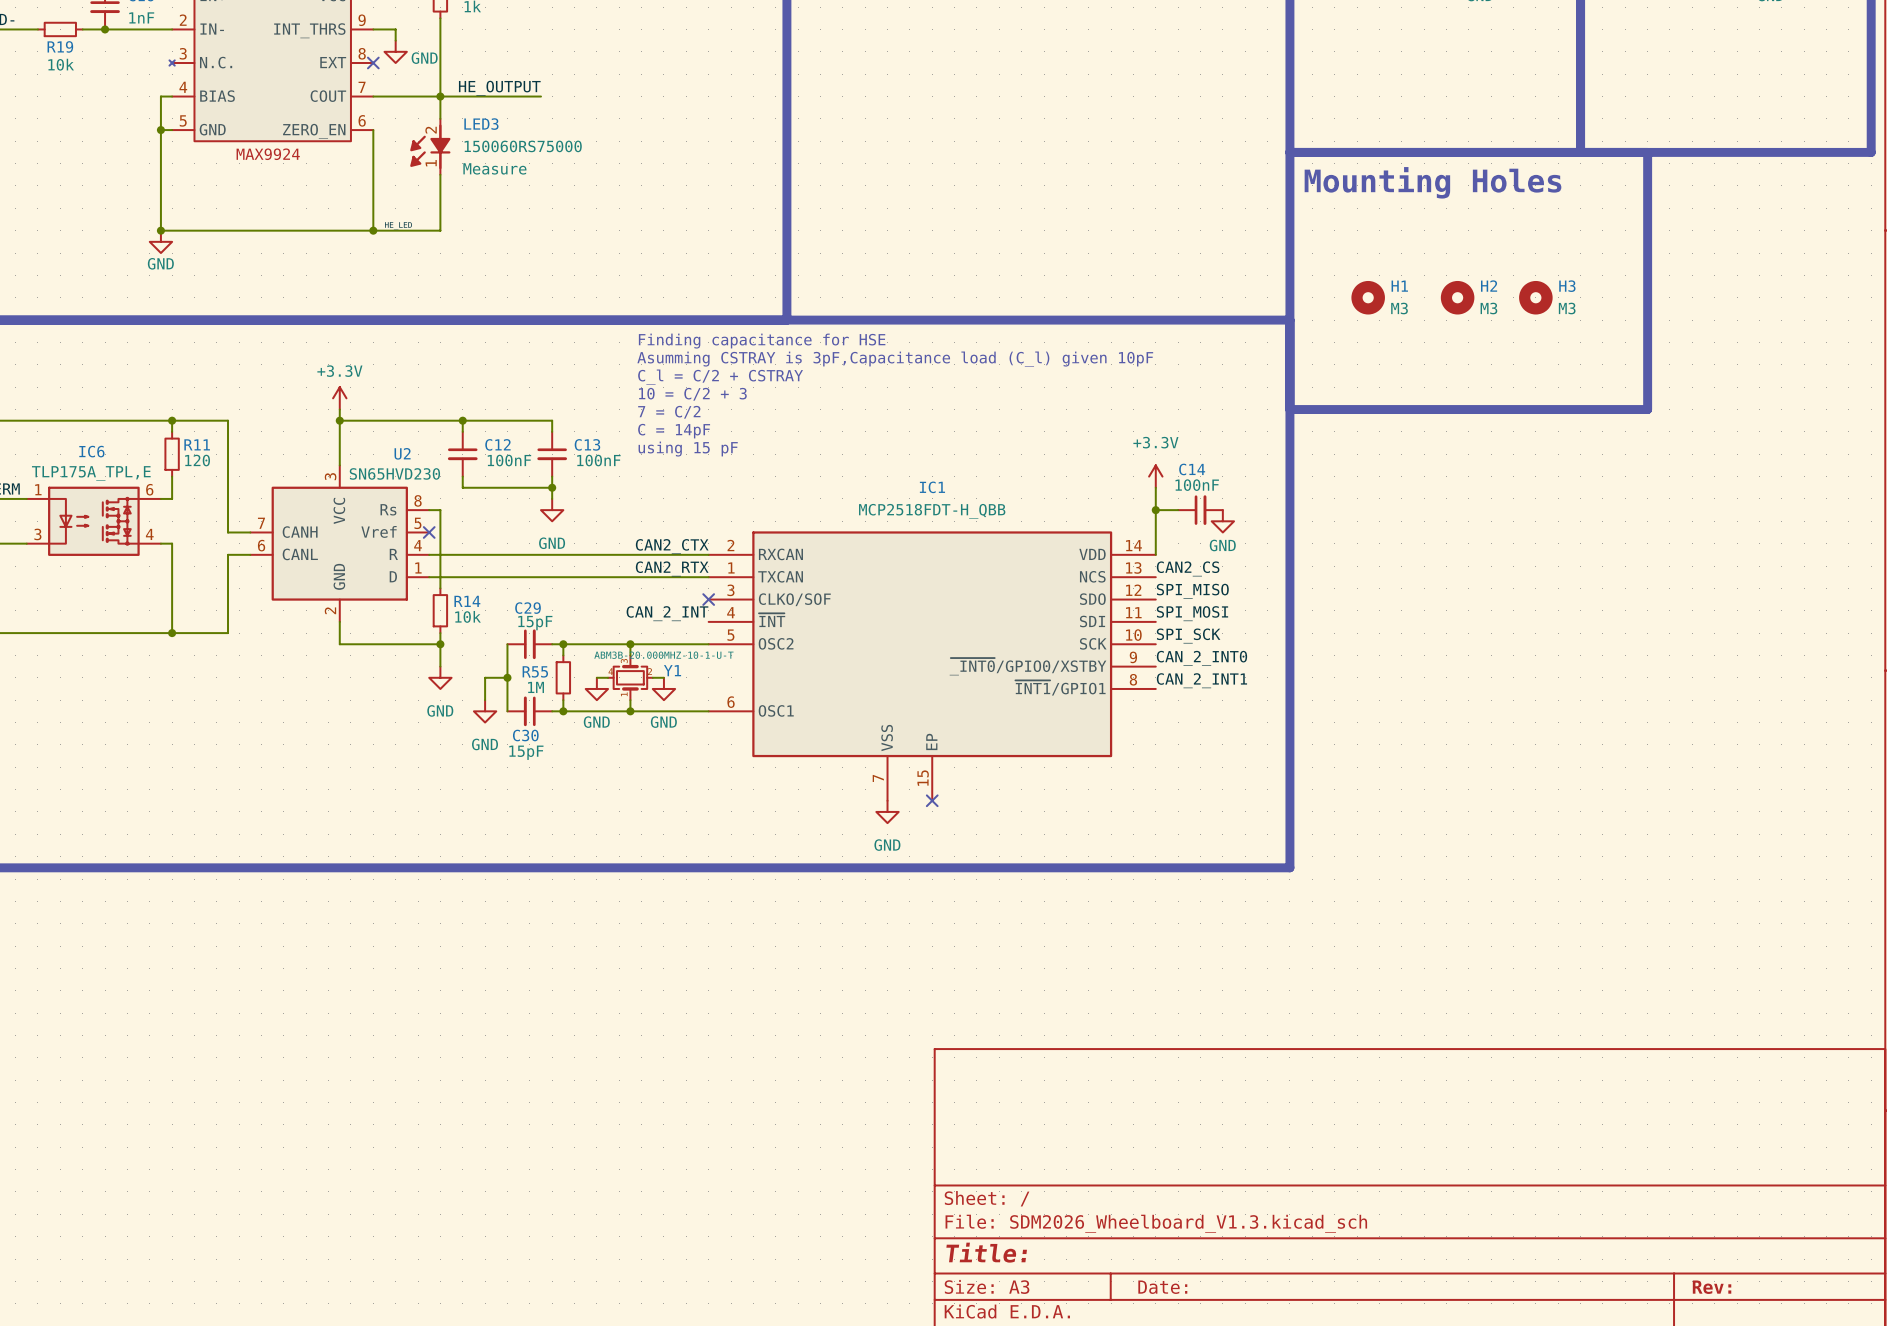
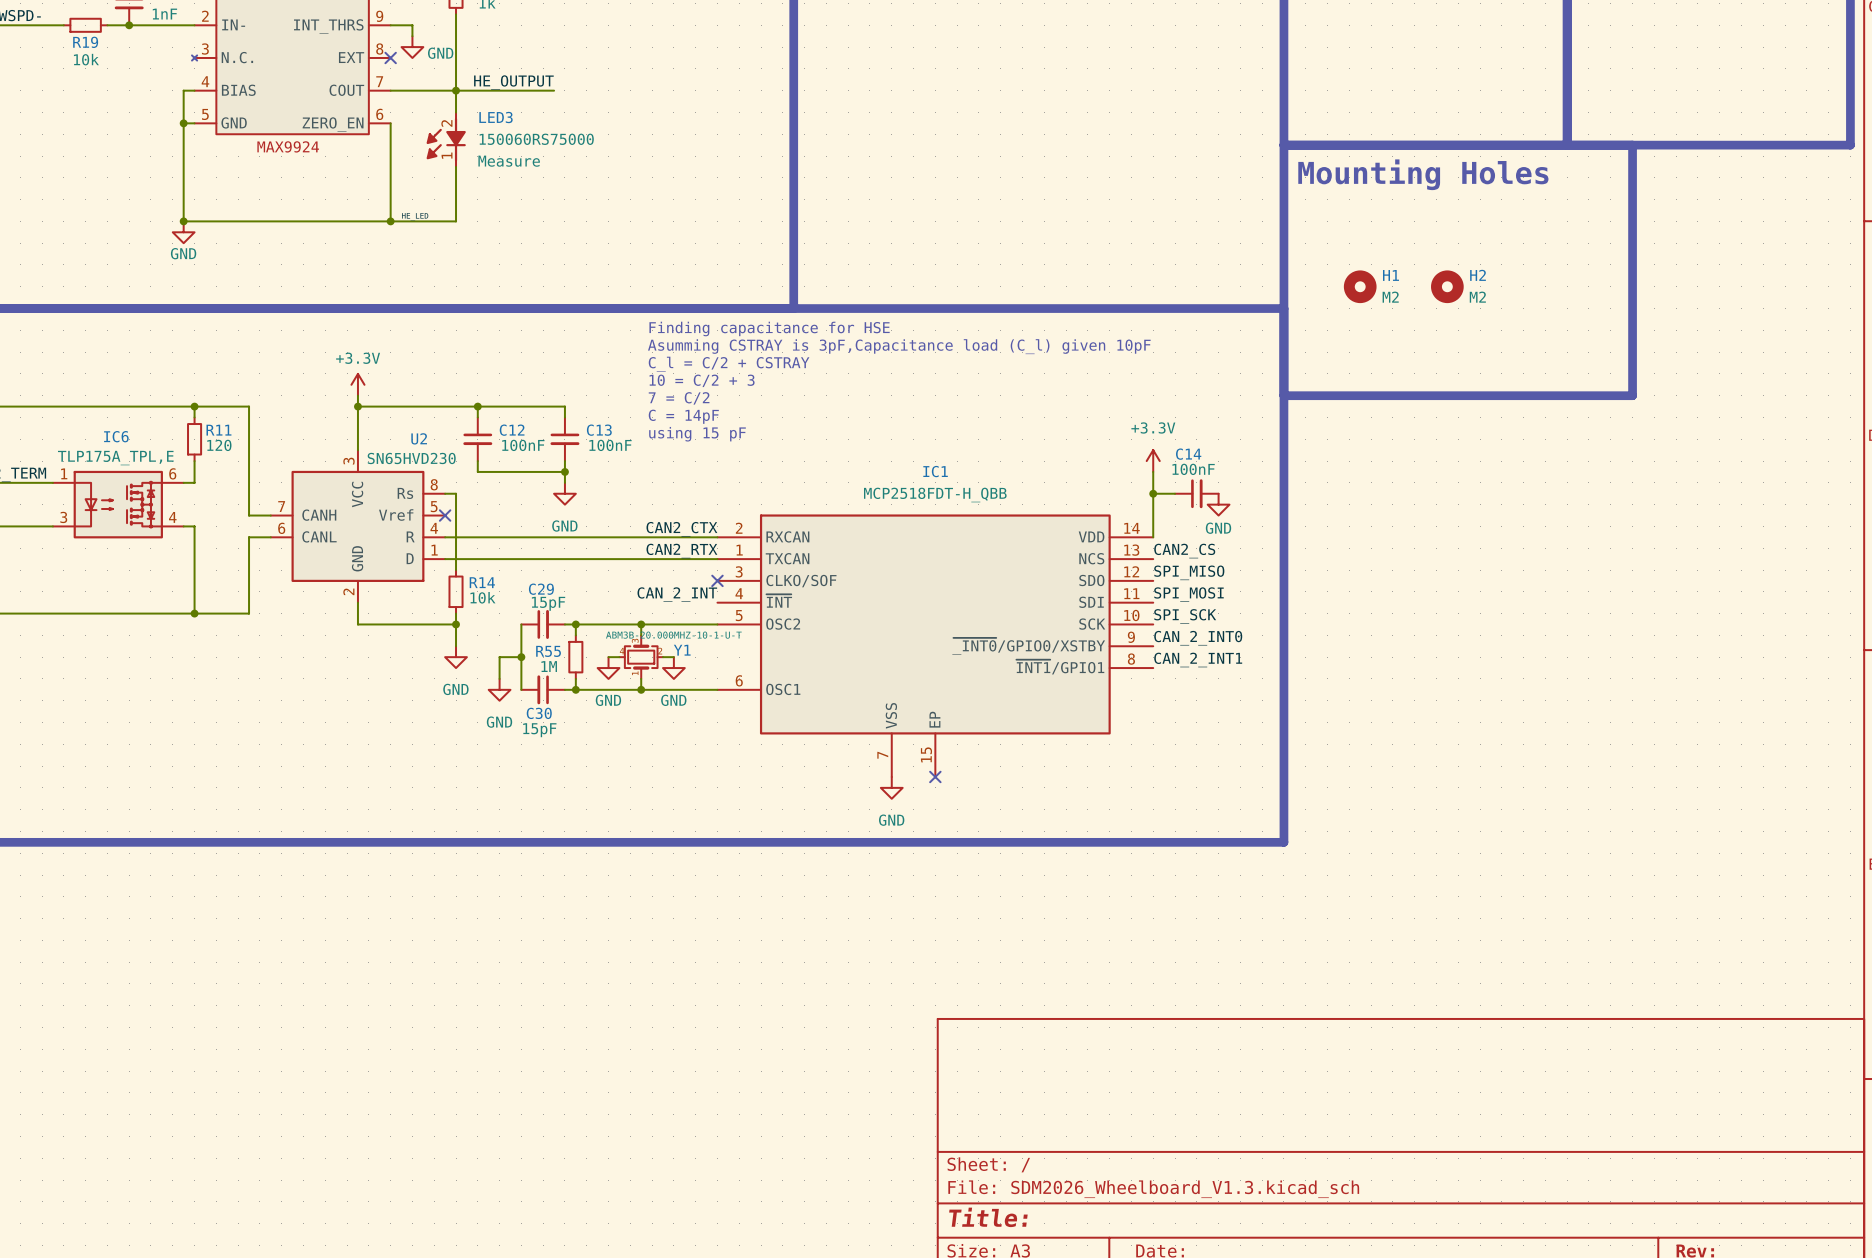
H3: M3 (1535, 297) -> none
H1 value: M3 (1399, 308) -> M2 (1390, 297)
H2 value: M3 (1488, 308) -> M2 (1477, 297)

